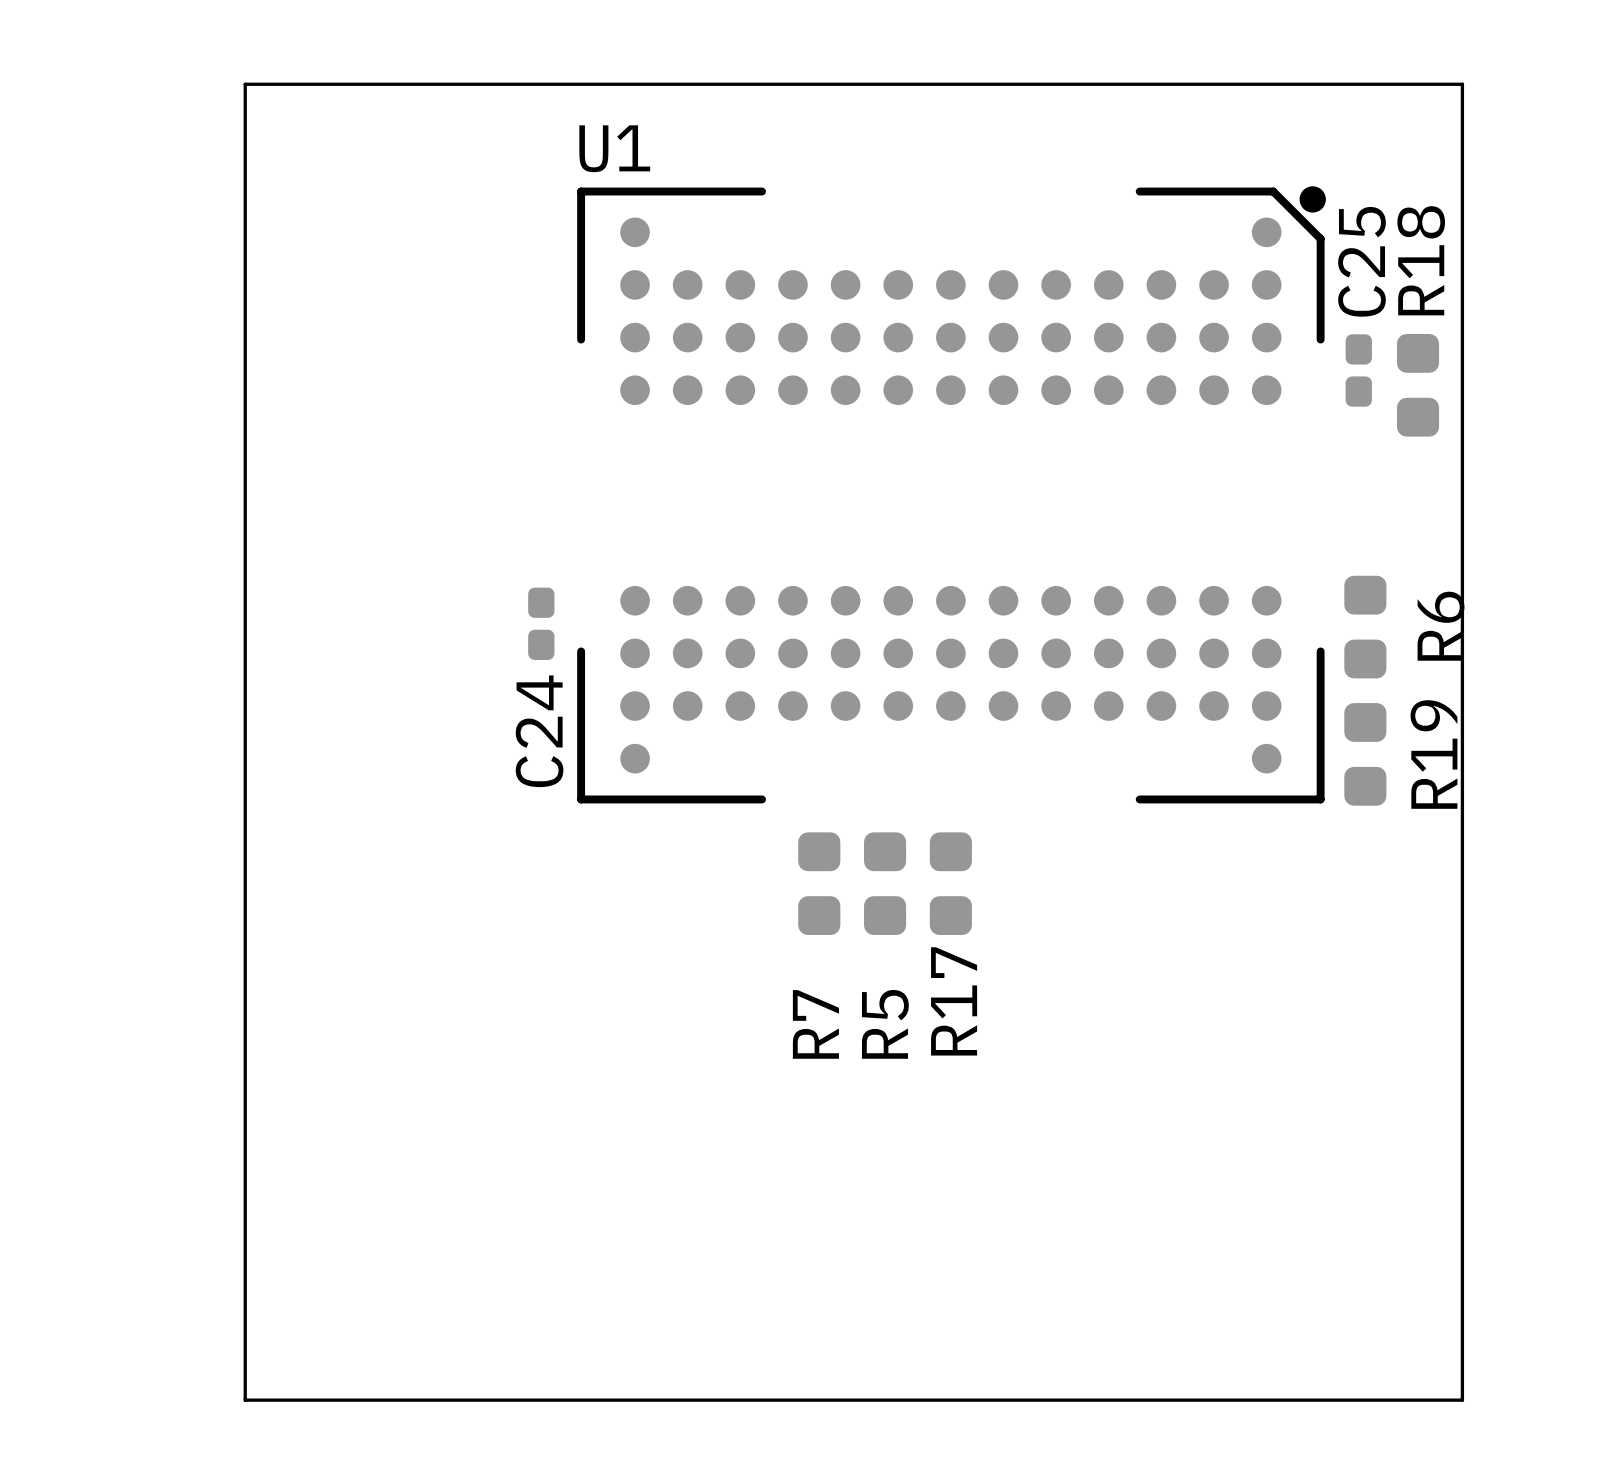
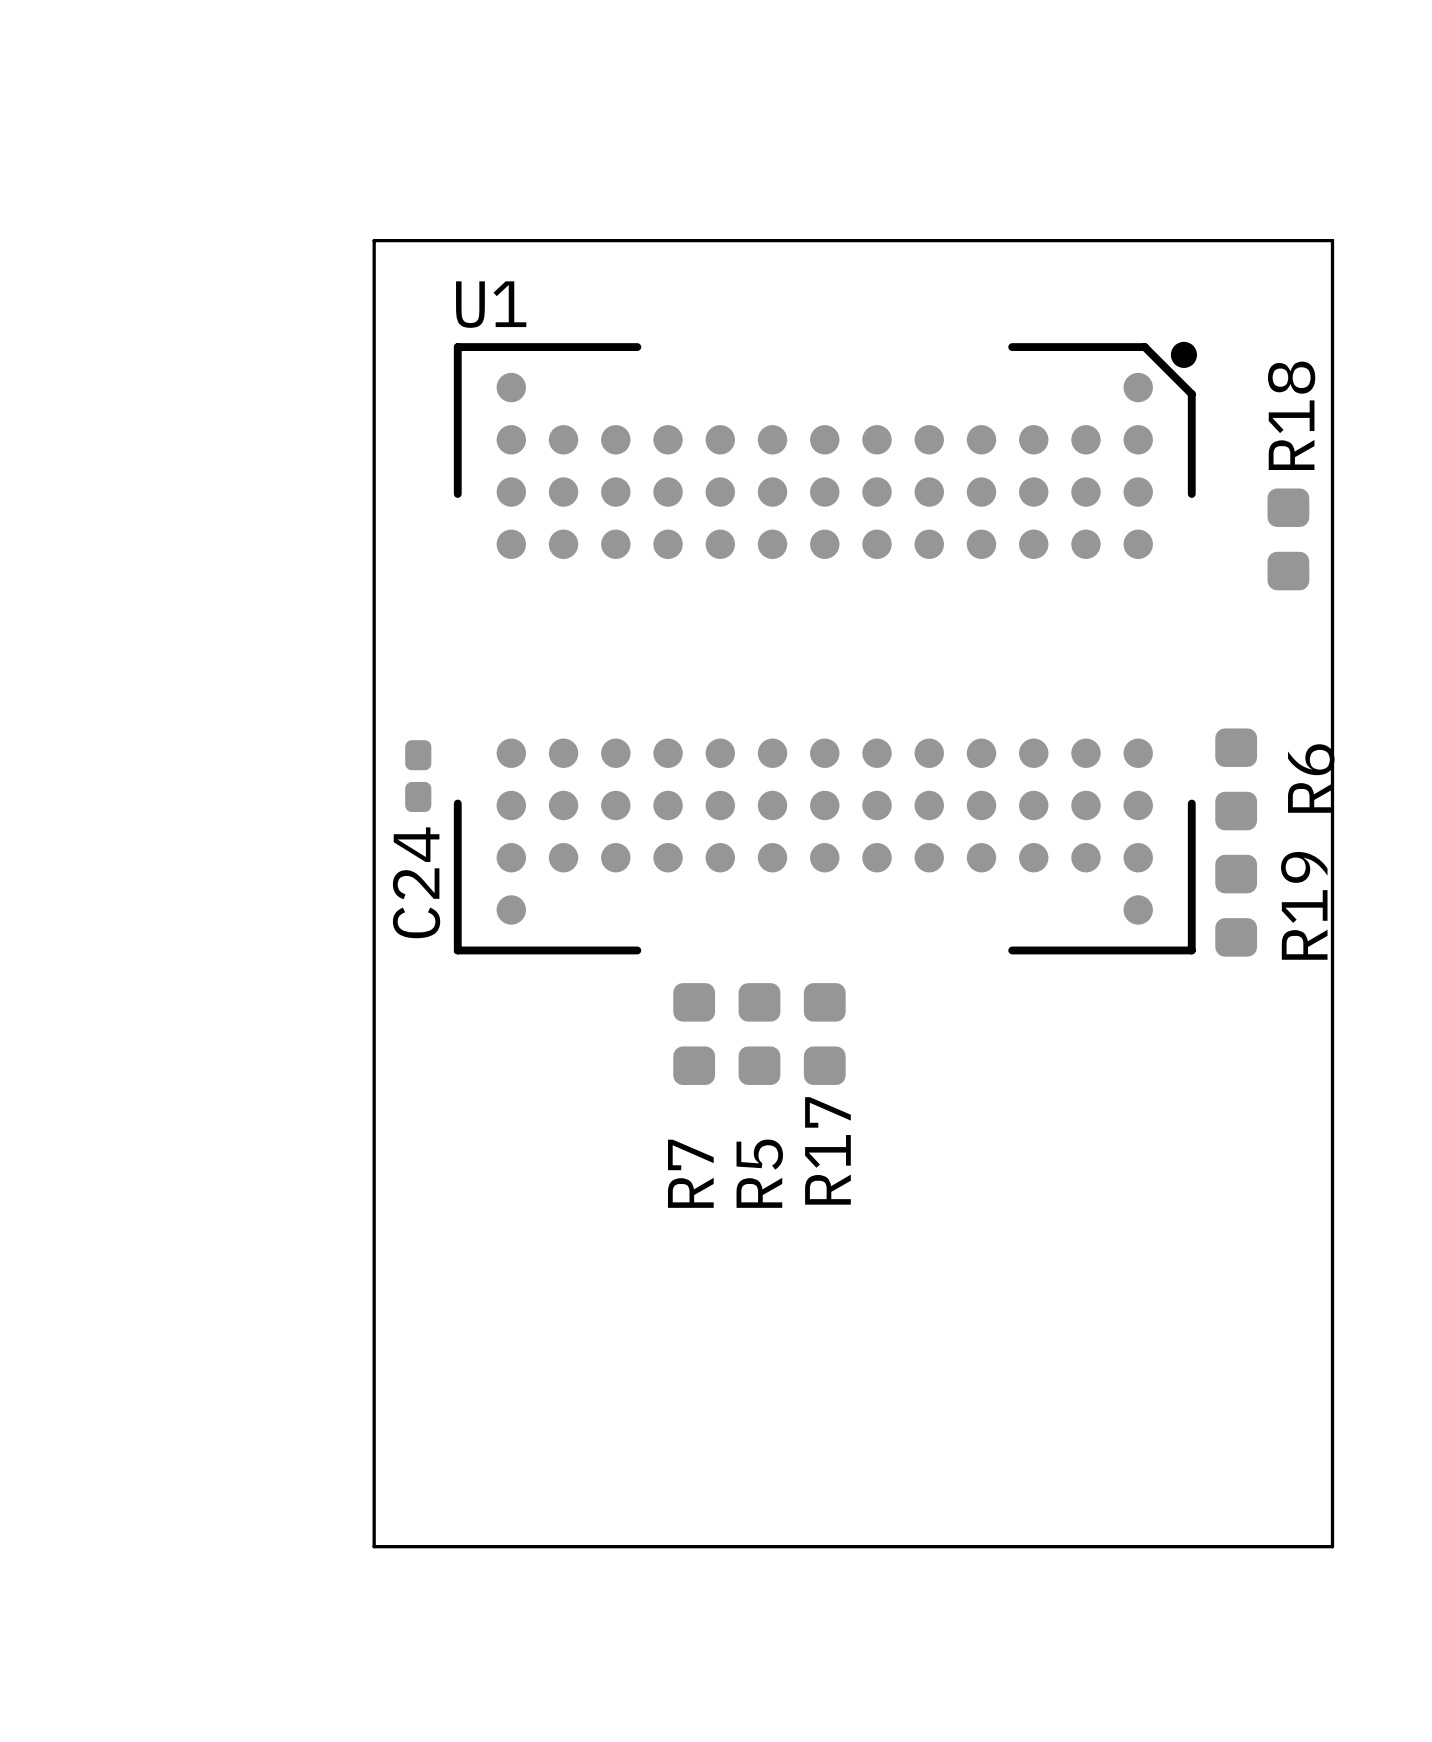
board edge: (496, 84) (245, 84) (245, 1400) (496, 1400) -> (374, 240) (374, 1546)
C25: (1358, 370) -> none

